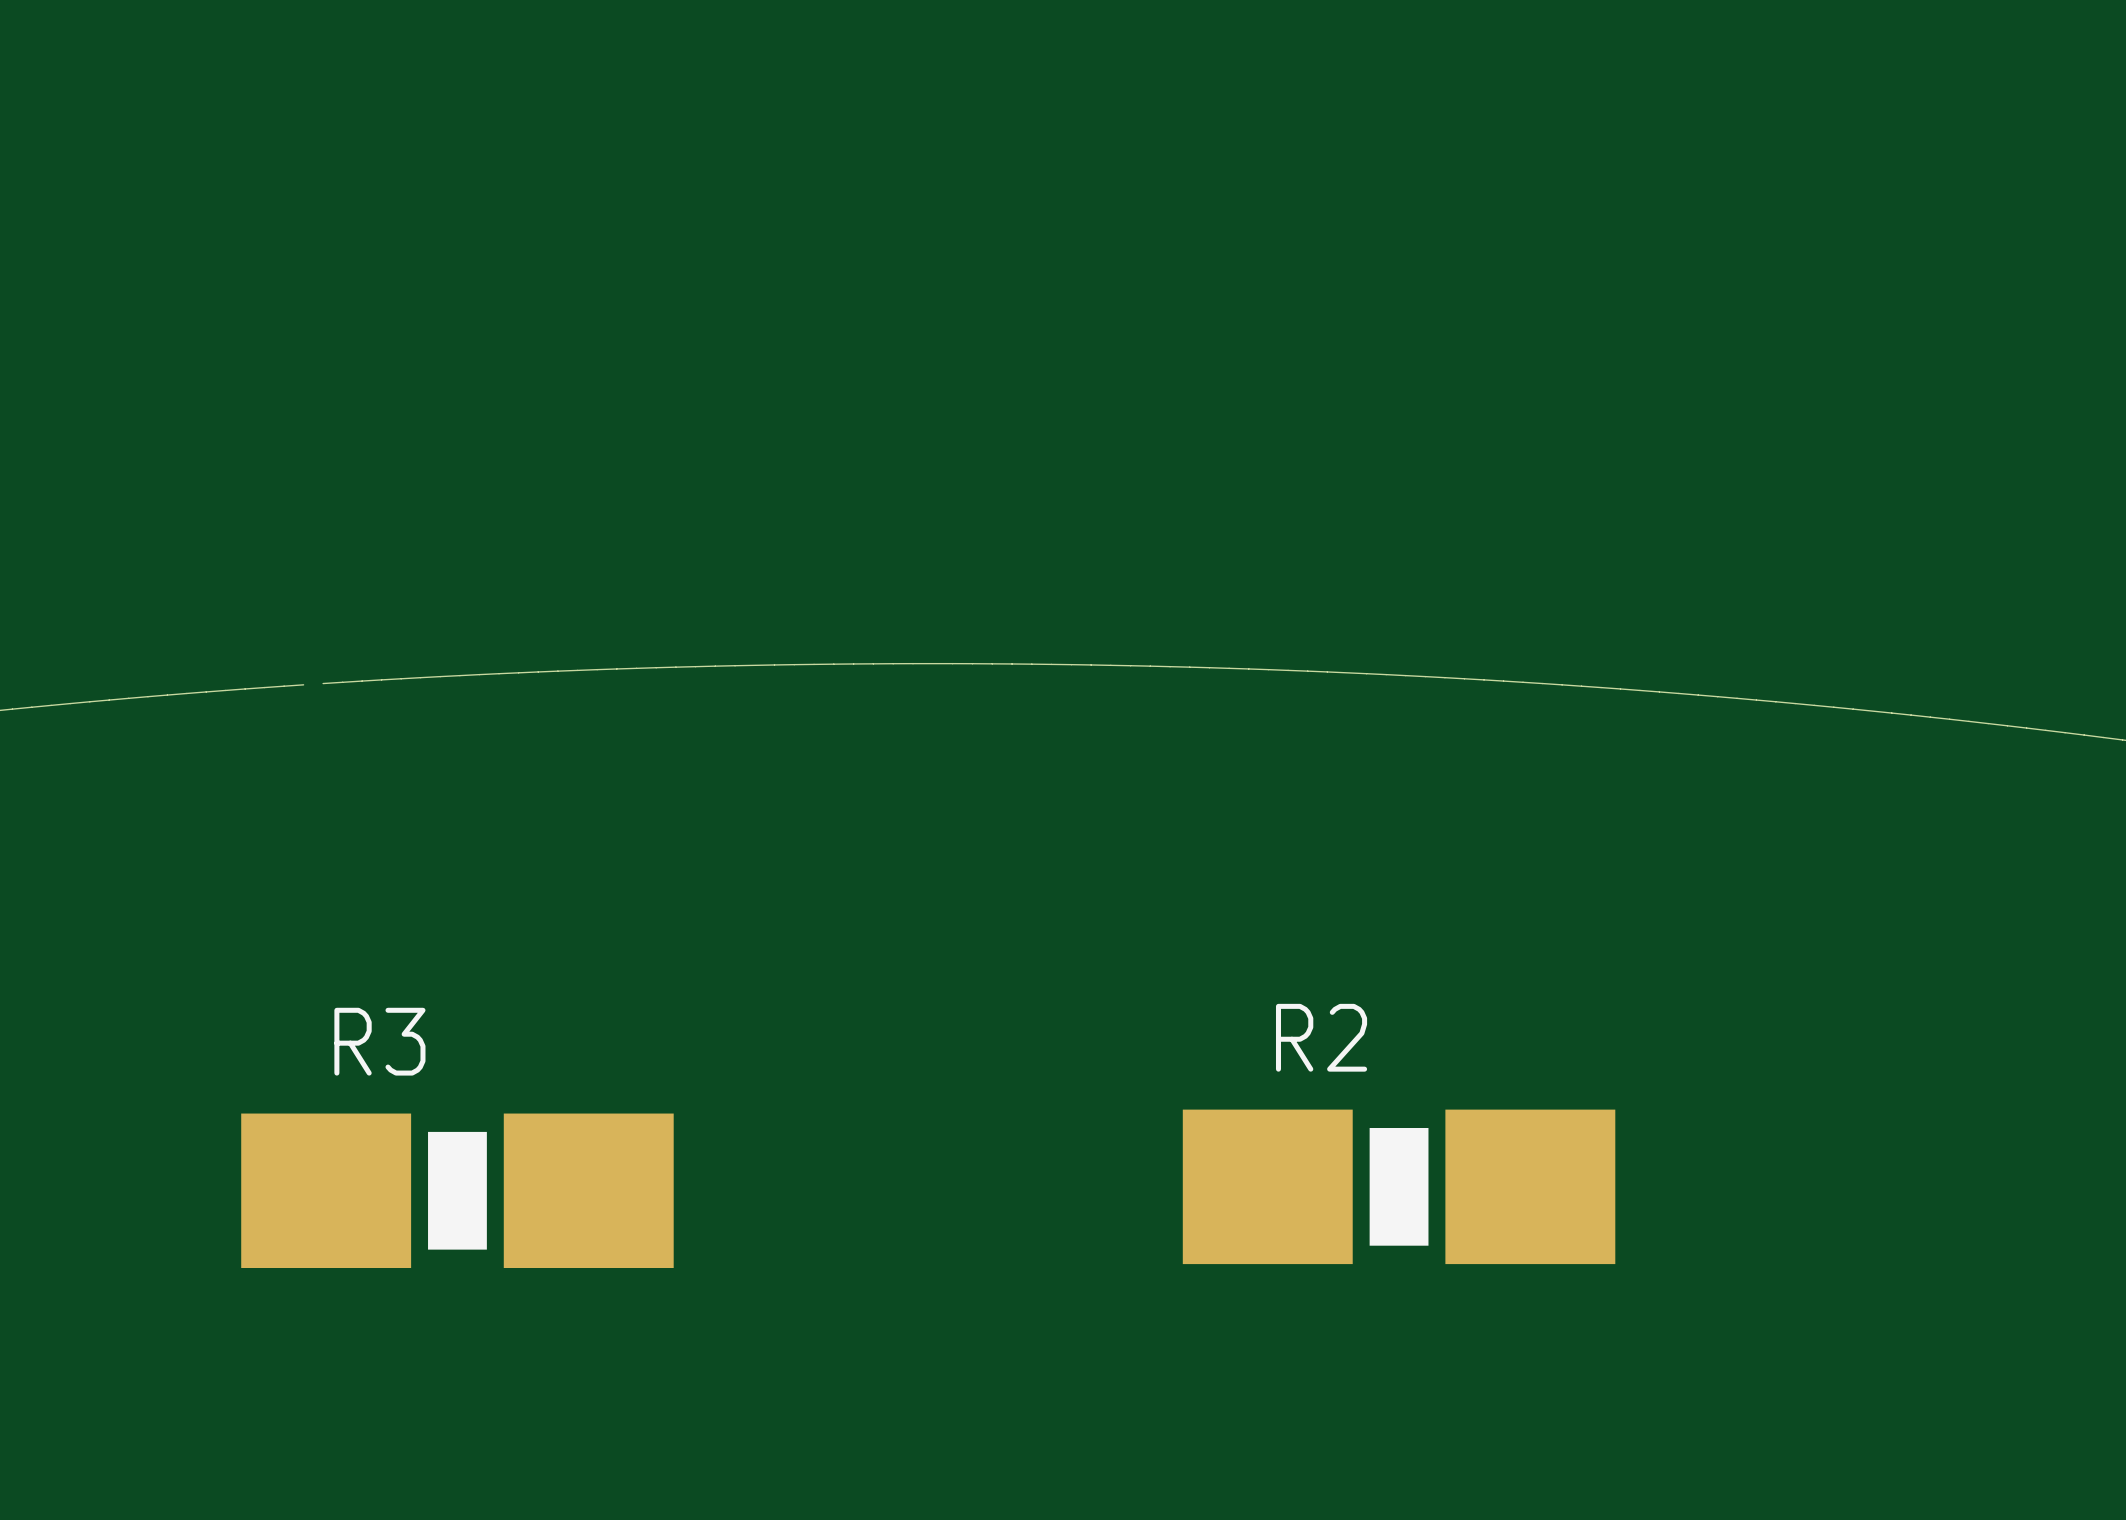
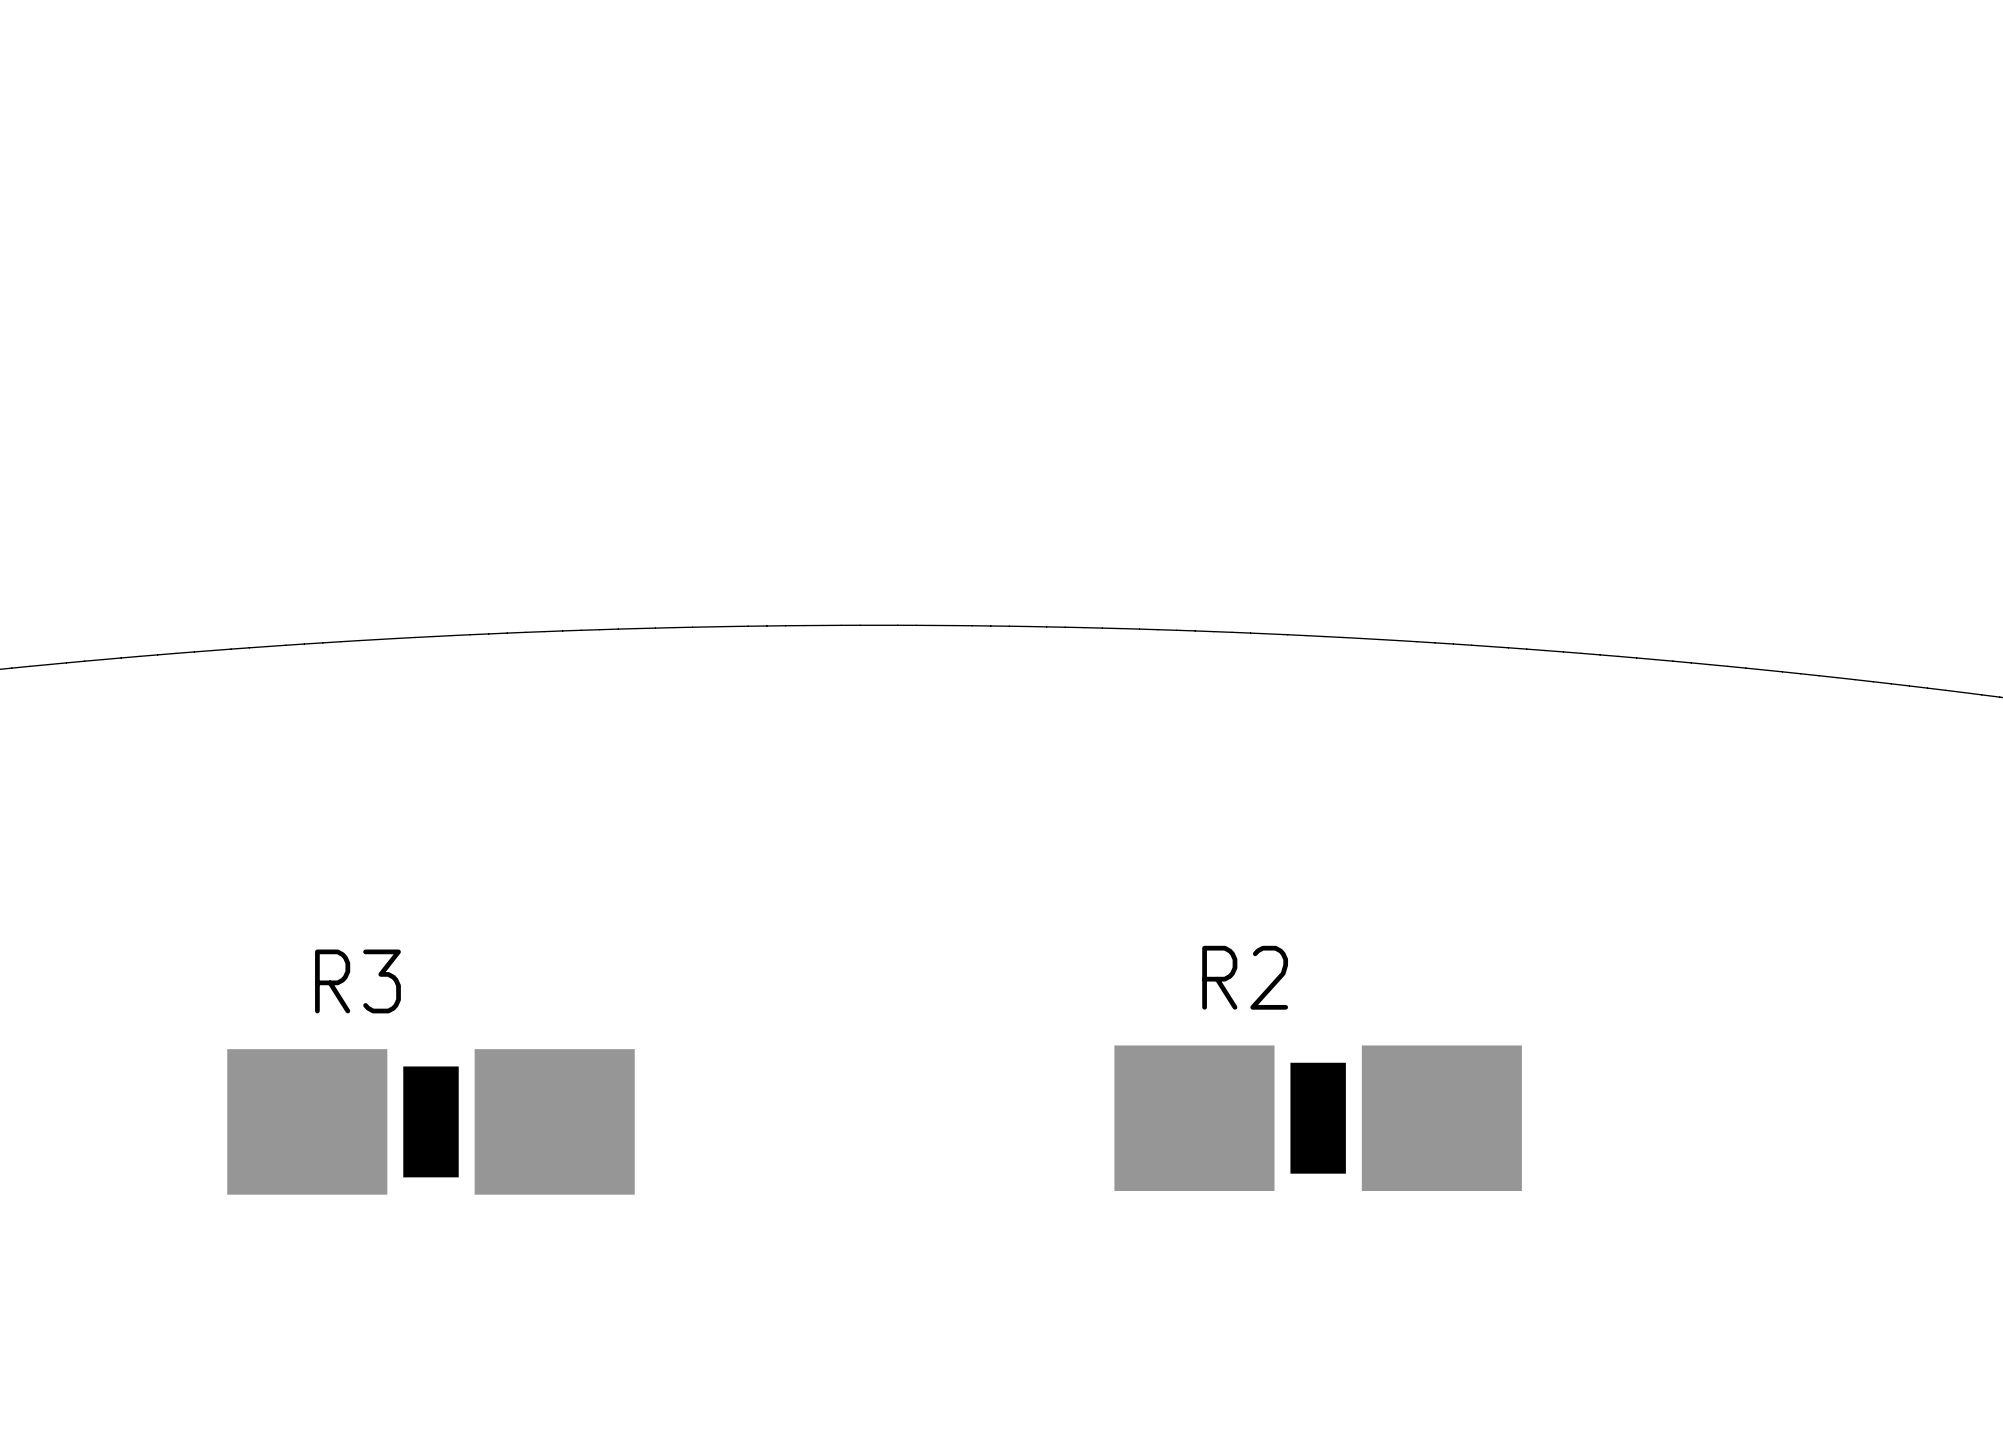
board edge: none -> (304, 644) (286, 645)

